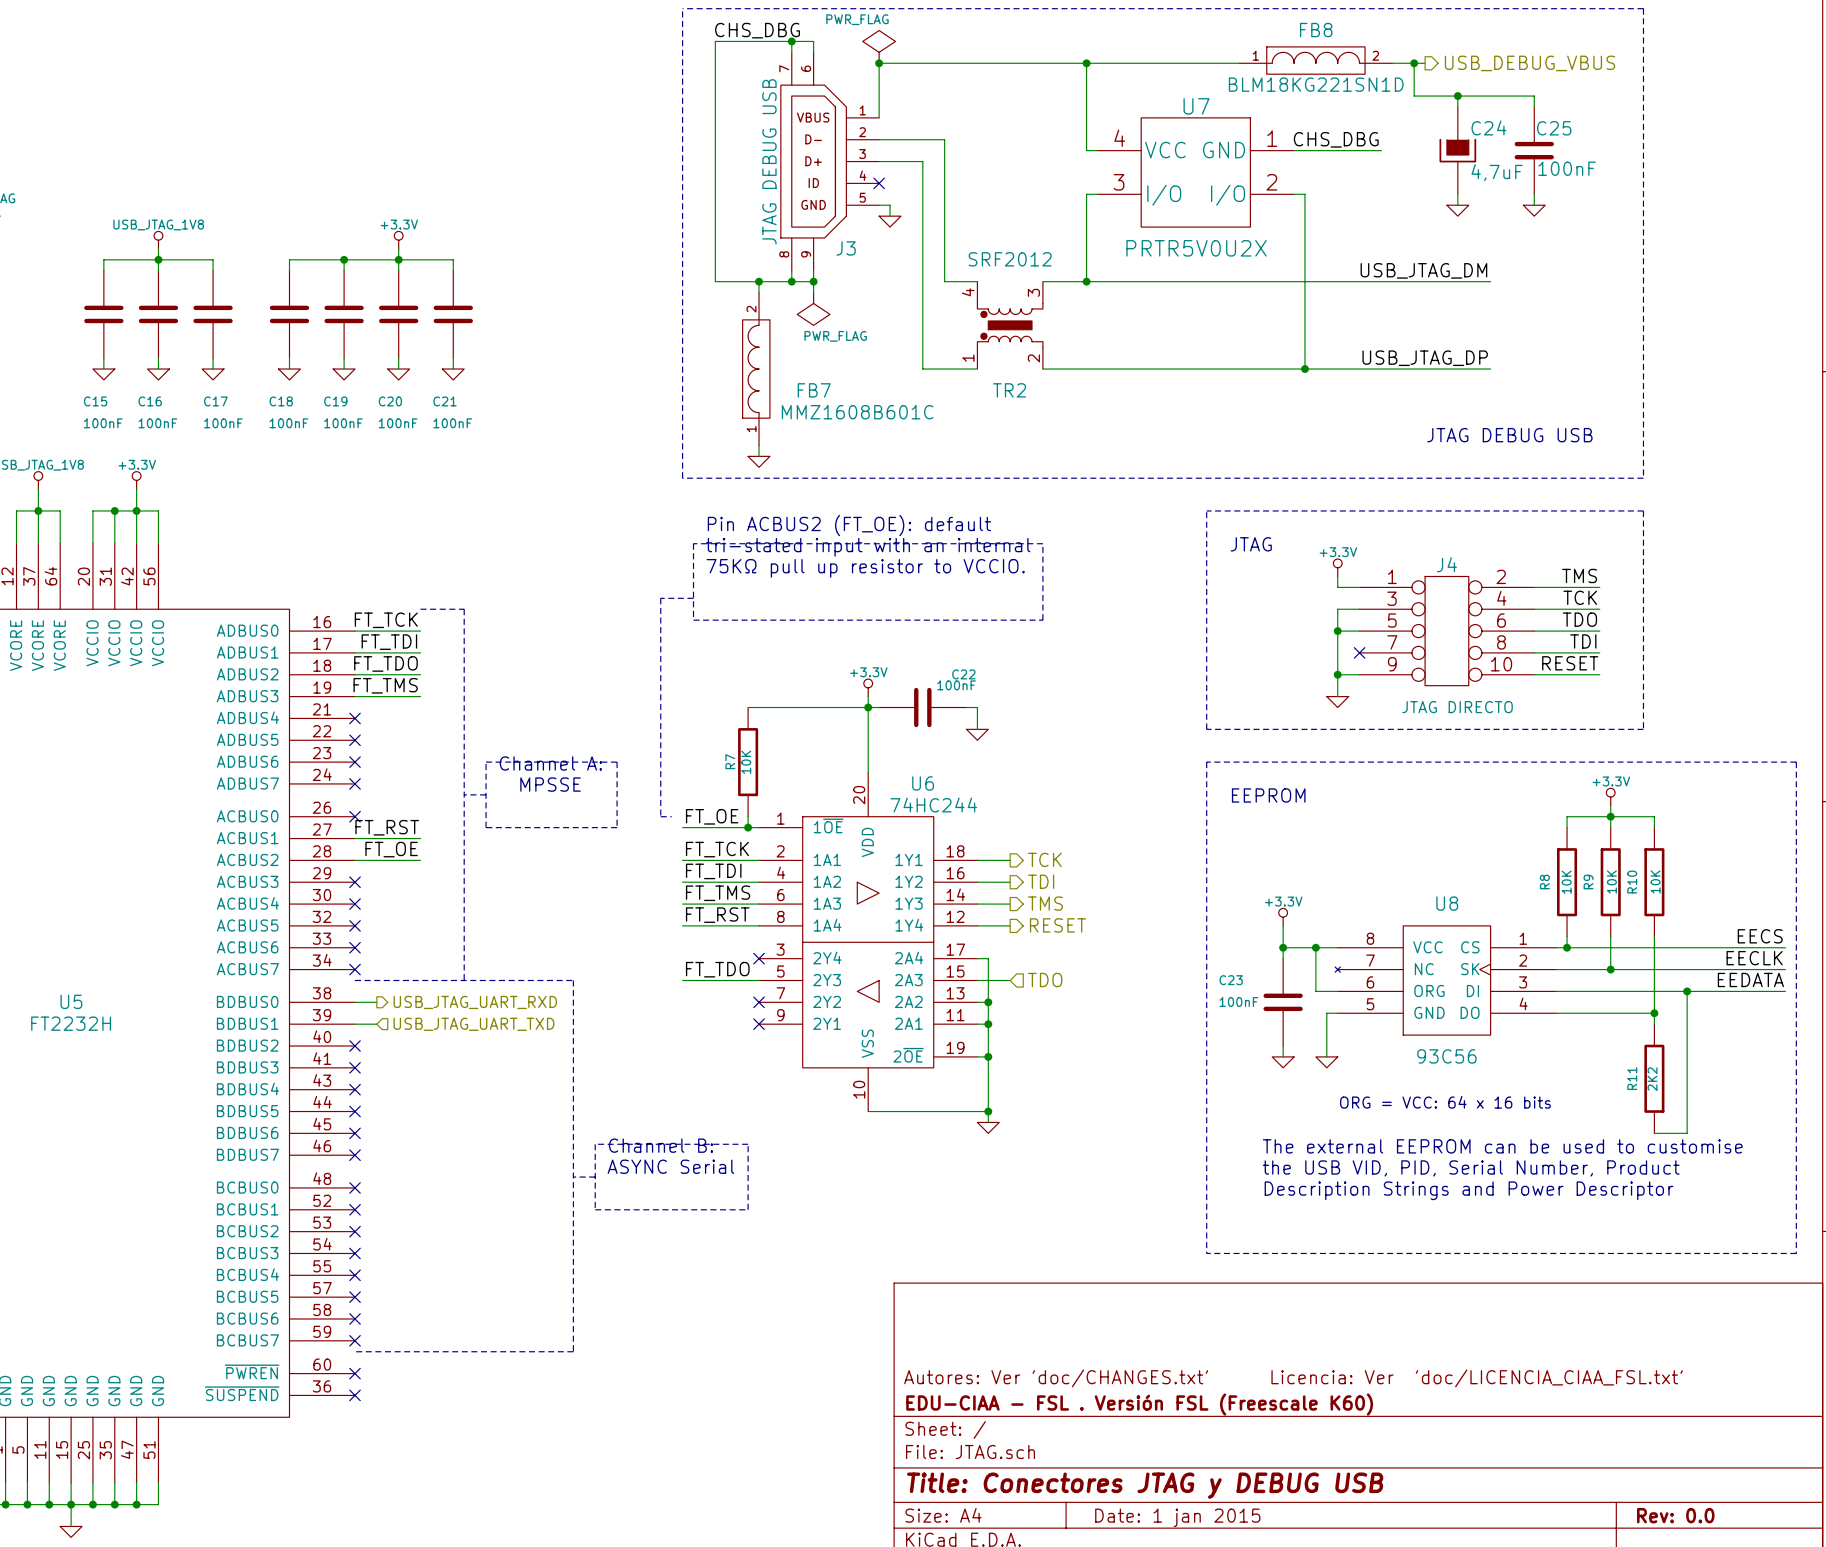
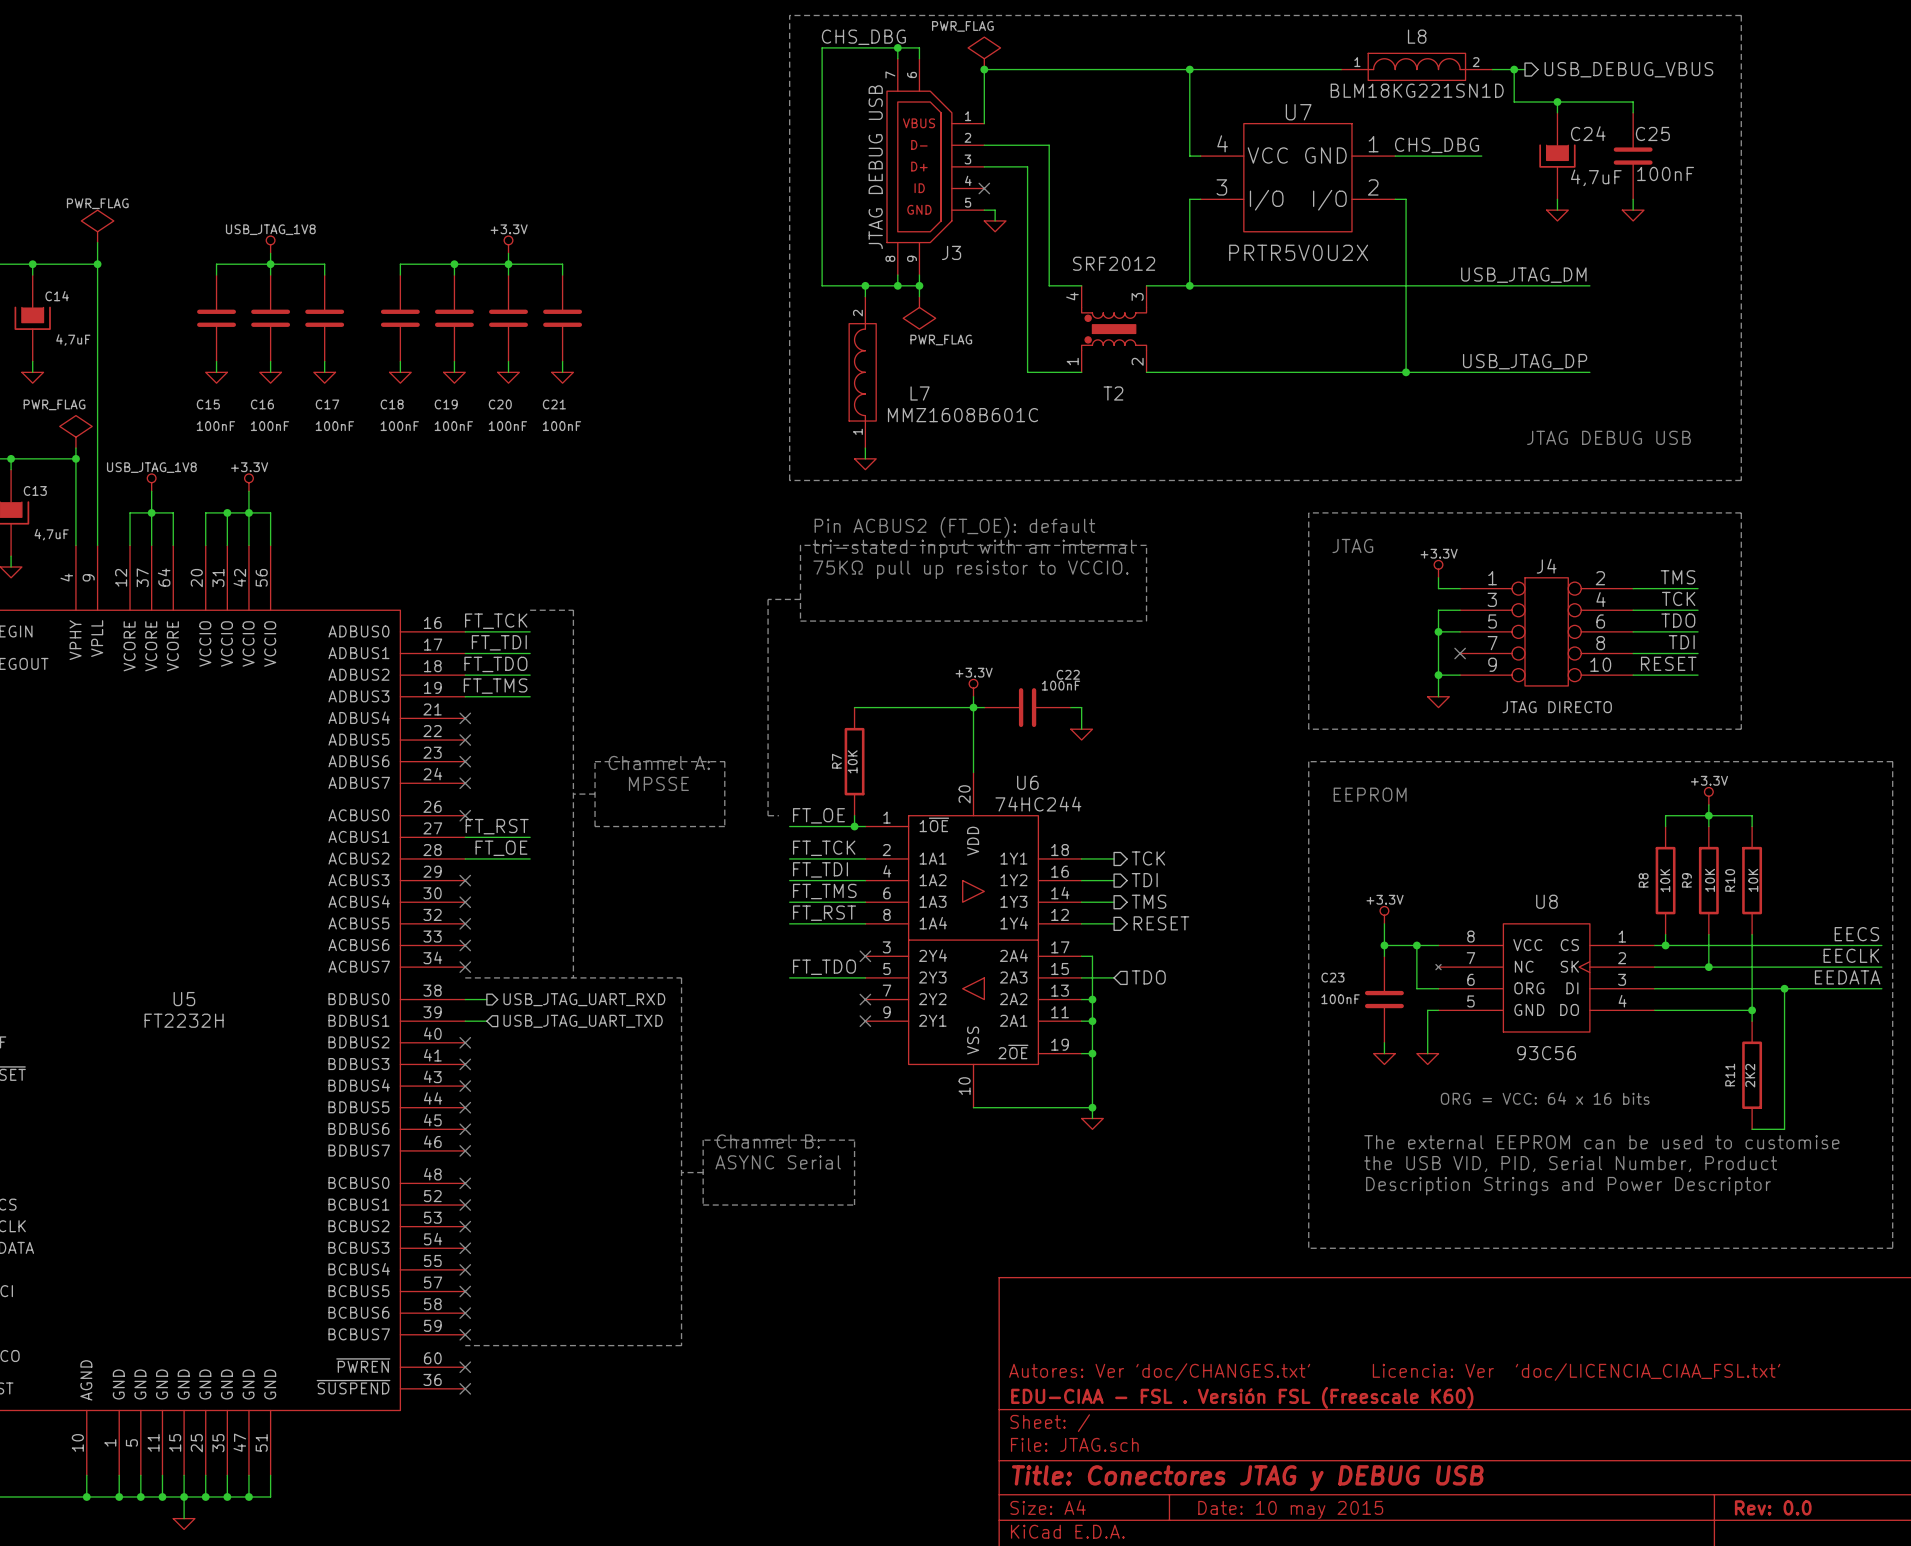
FB8 name: FB8 (1316, 30) -> L8 (1417, 36)
FB7 name: FB7 (814, 390) -> L7 (920, 393)
TR2 name: TR2 (1009, 390) -> T2 (1113, 393)
title block: Date: 1 jan 2015 (1177, 1517) -> Date: 10 may 2015 (1290, 1510)

